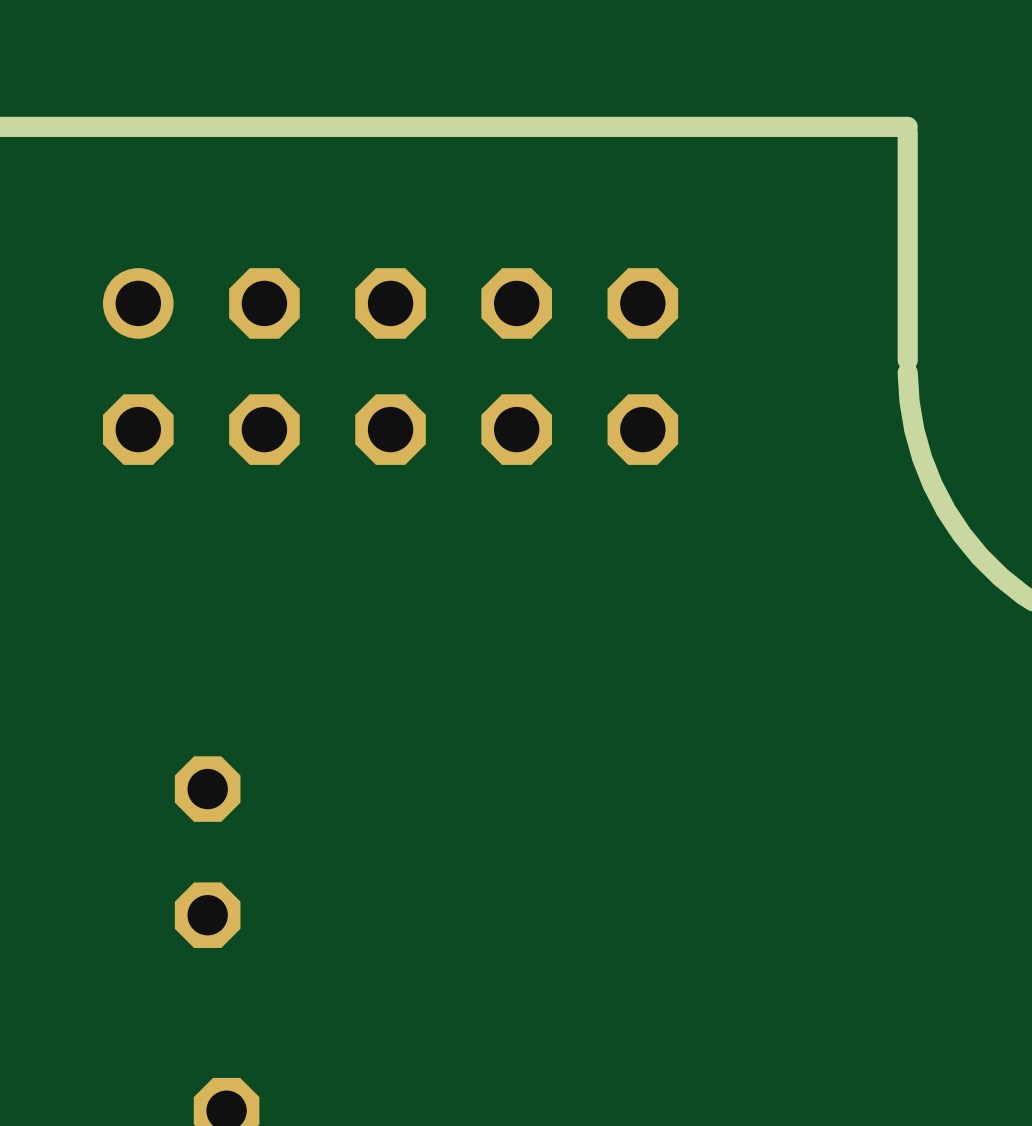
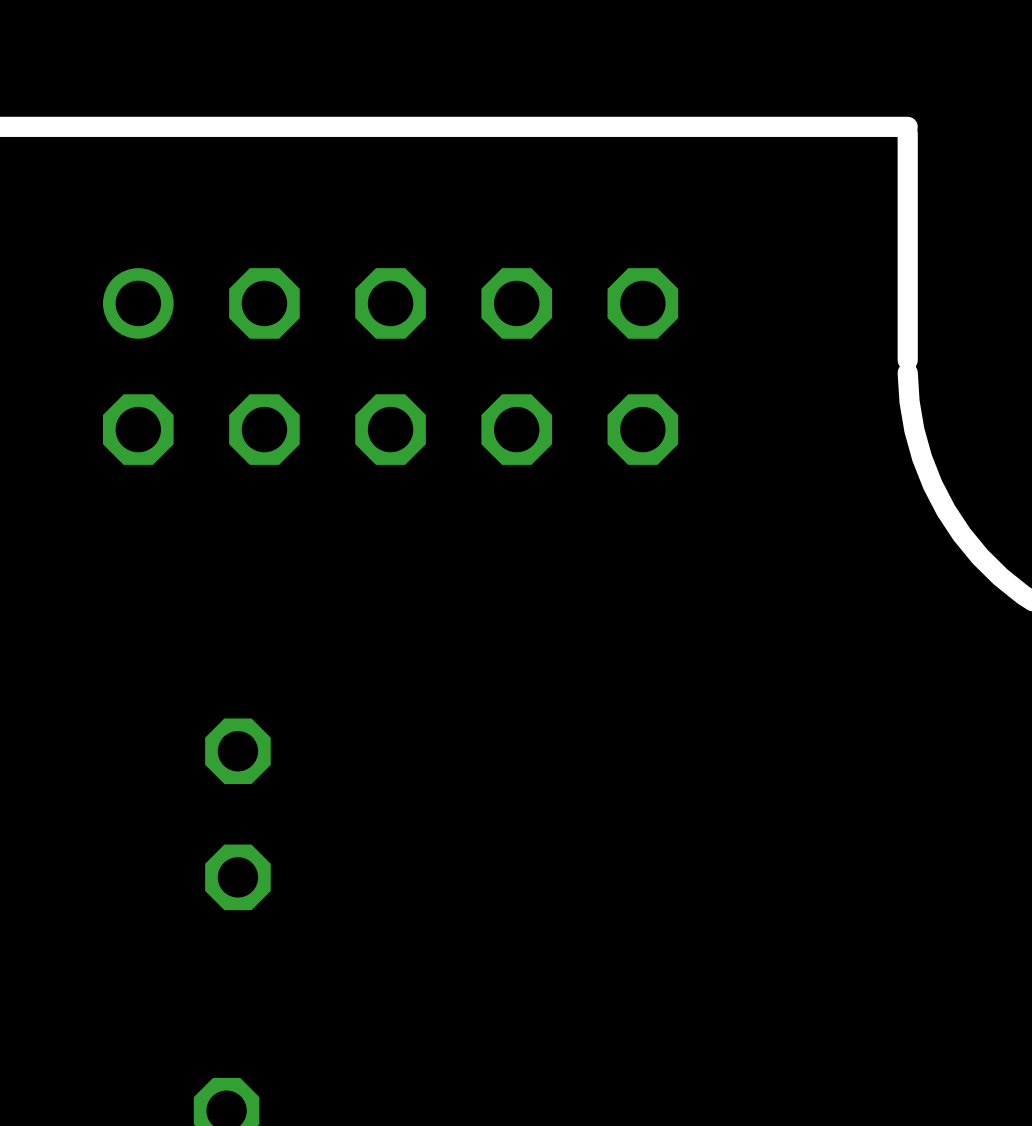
part position: (207, 852) -> (237, 814)

